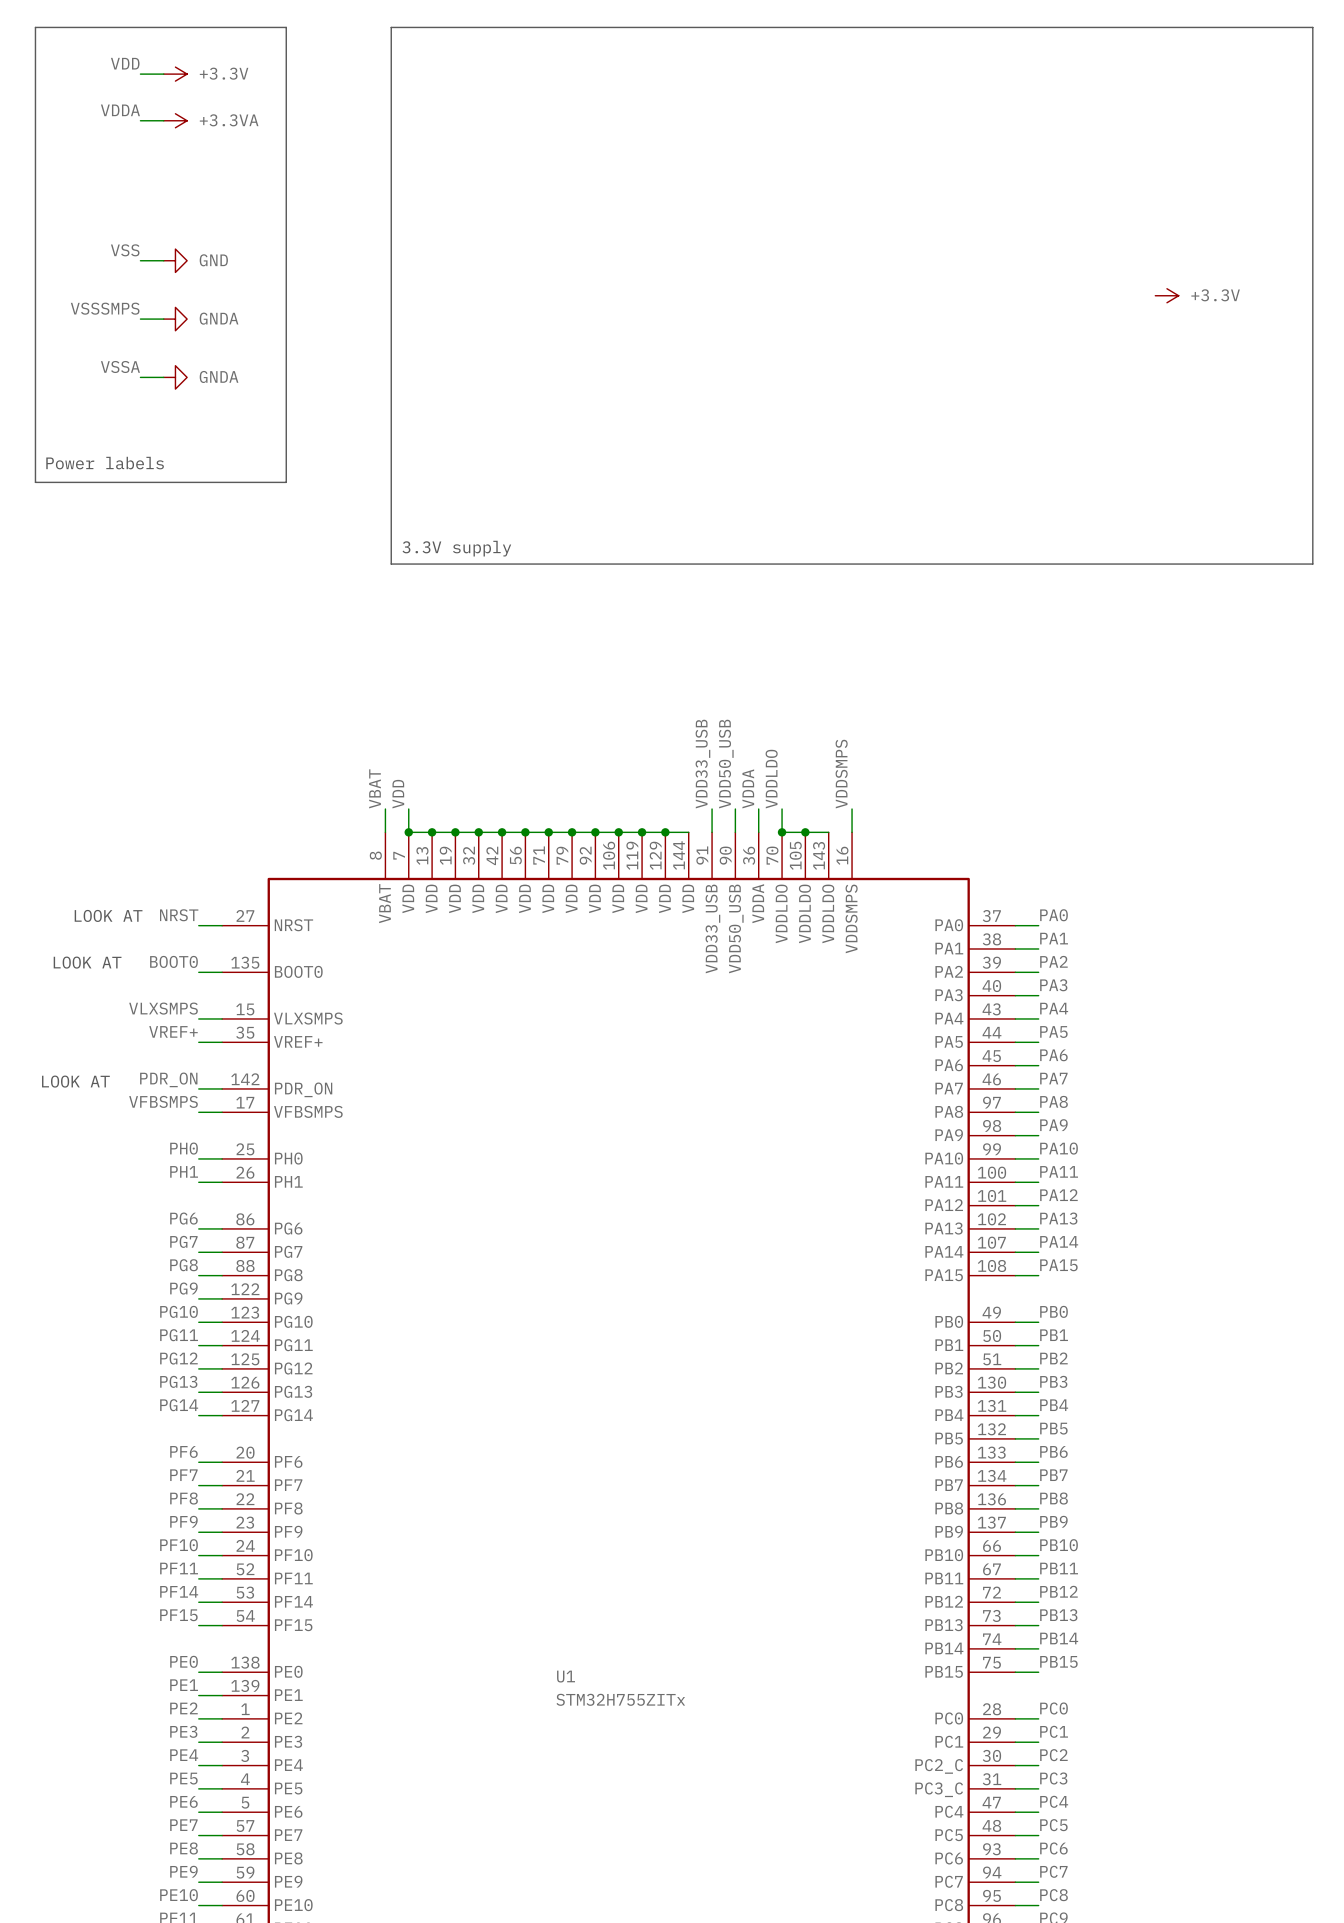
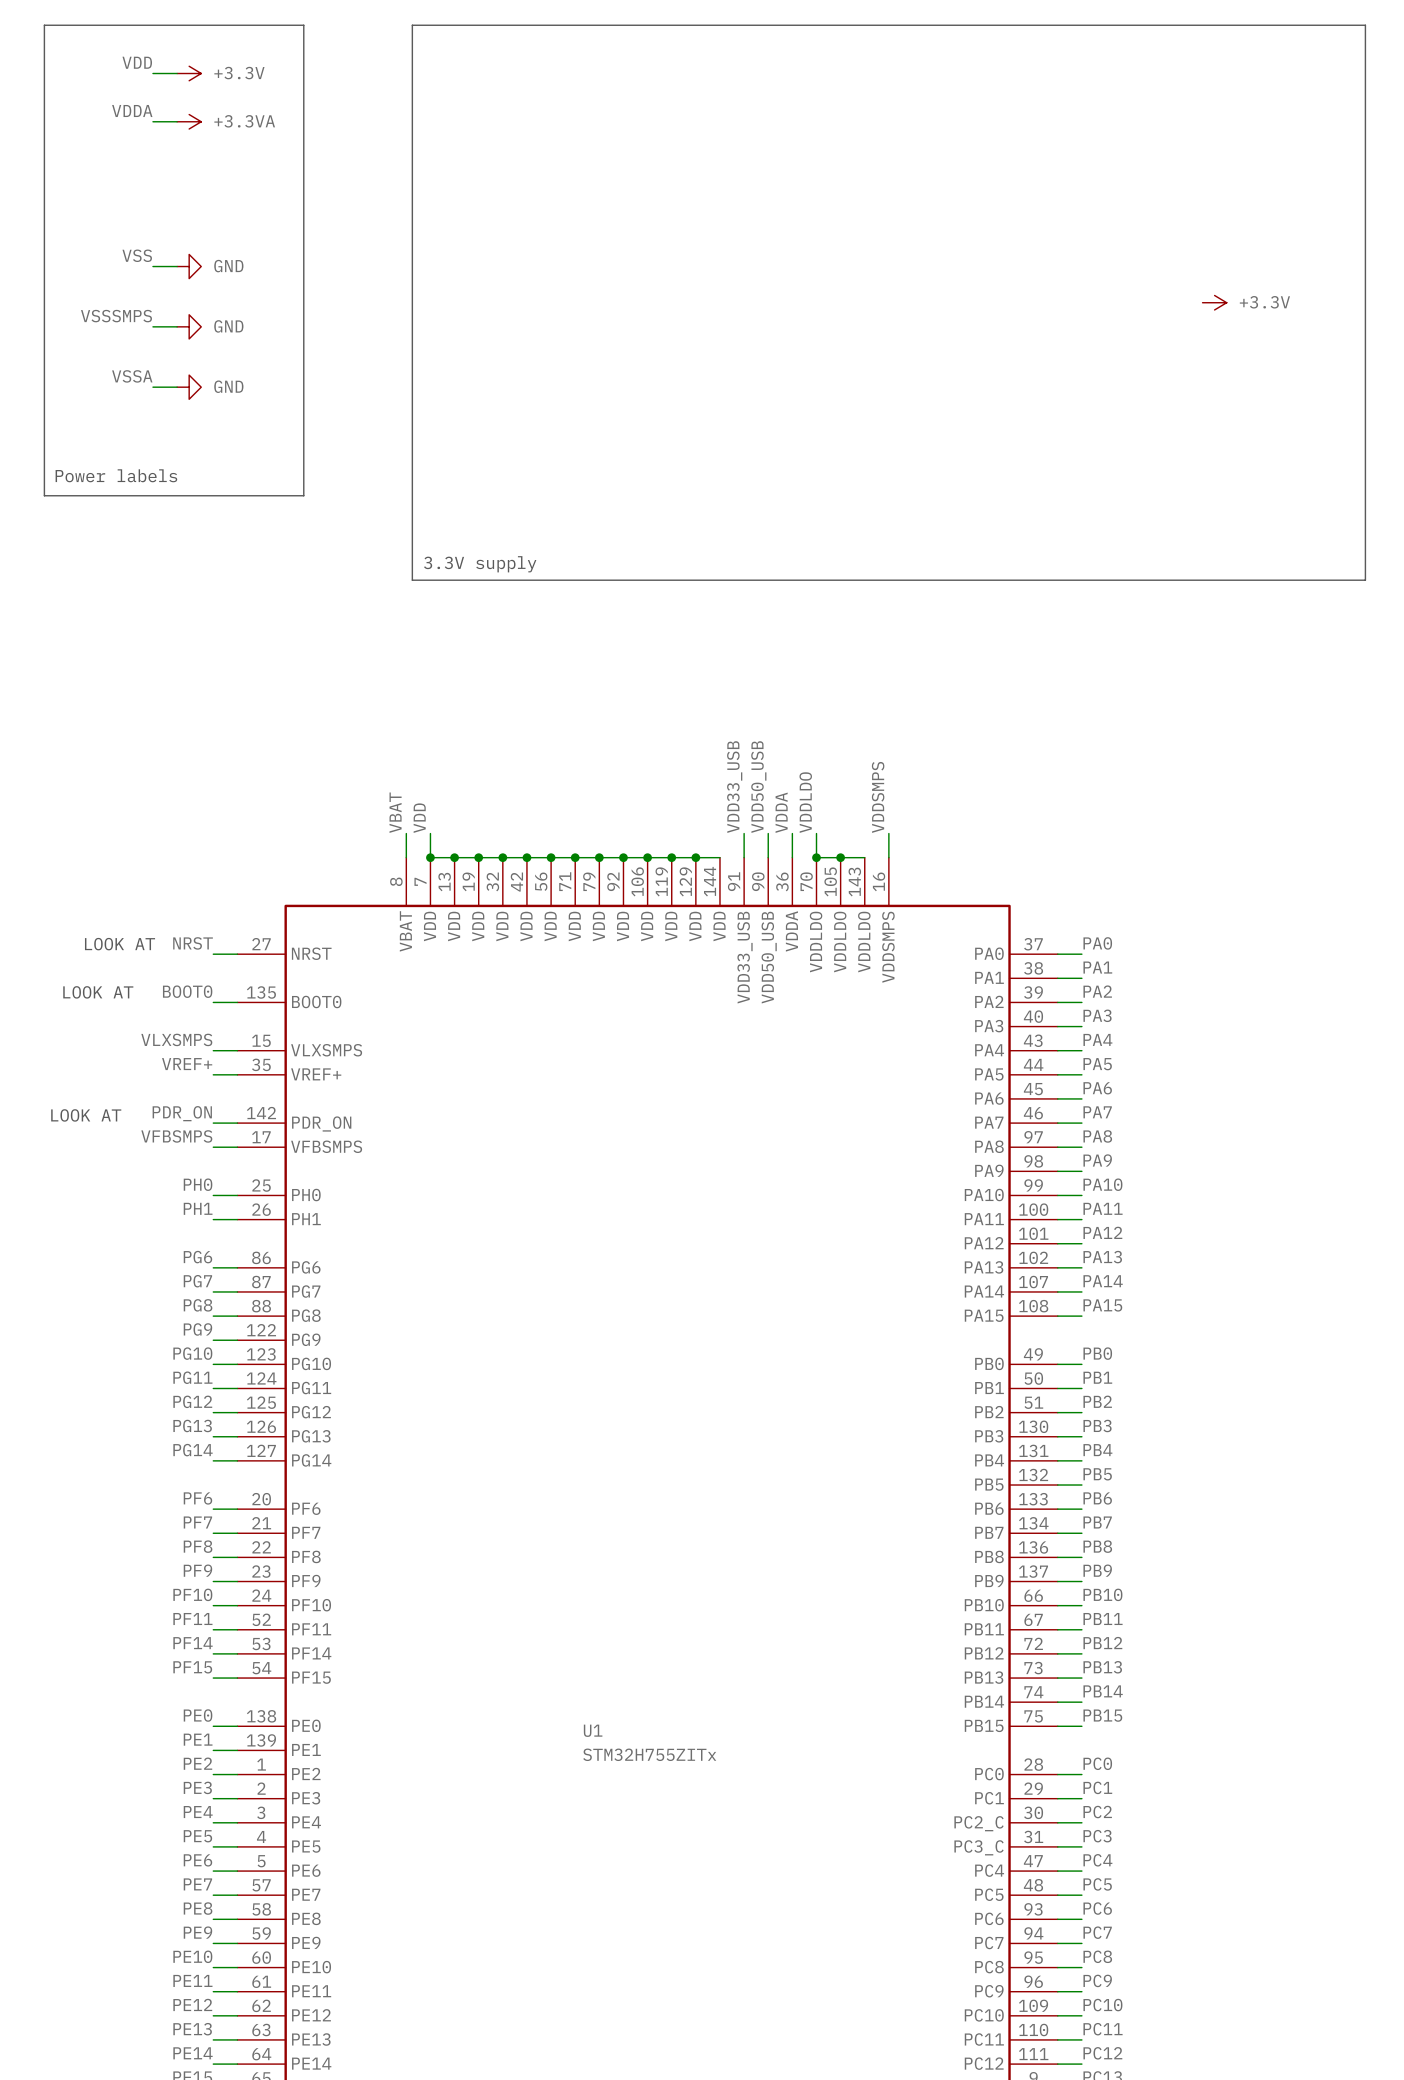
power symbol: GNDA (175, 319) -> GND (189, 326)
power symbol: GNDA (175, 377) -> GND (189, 387)

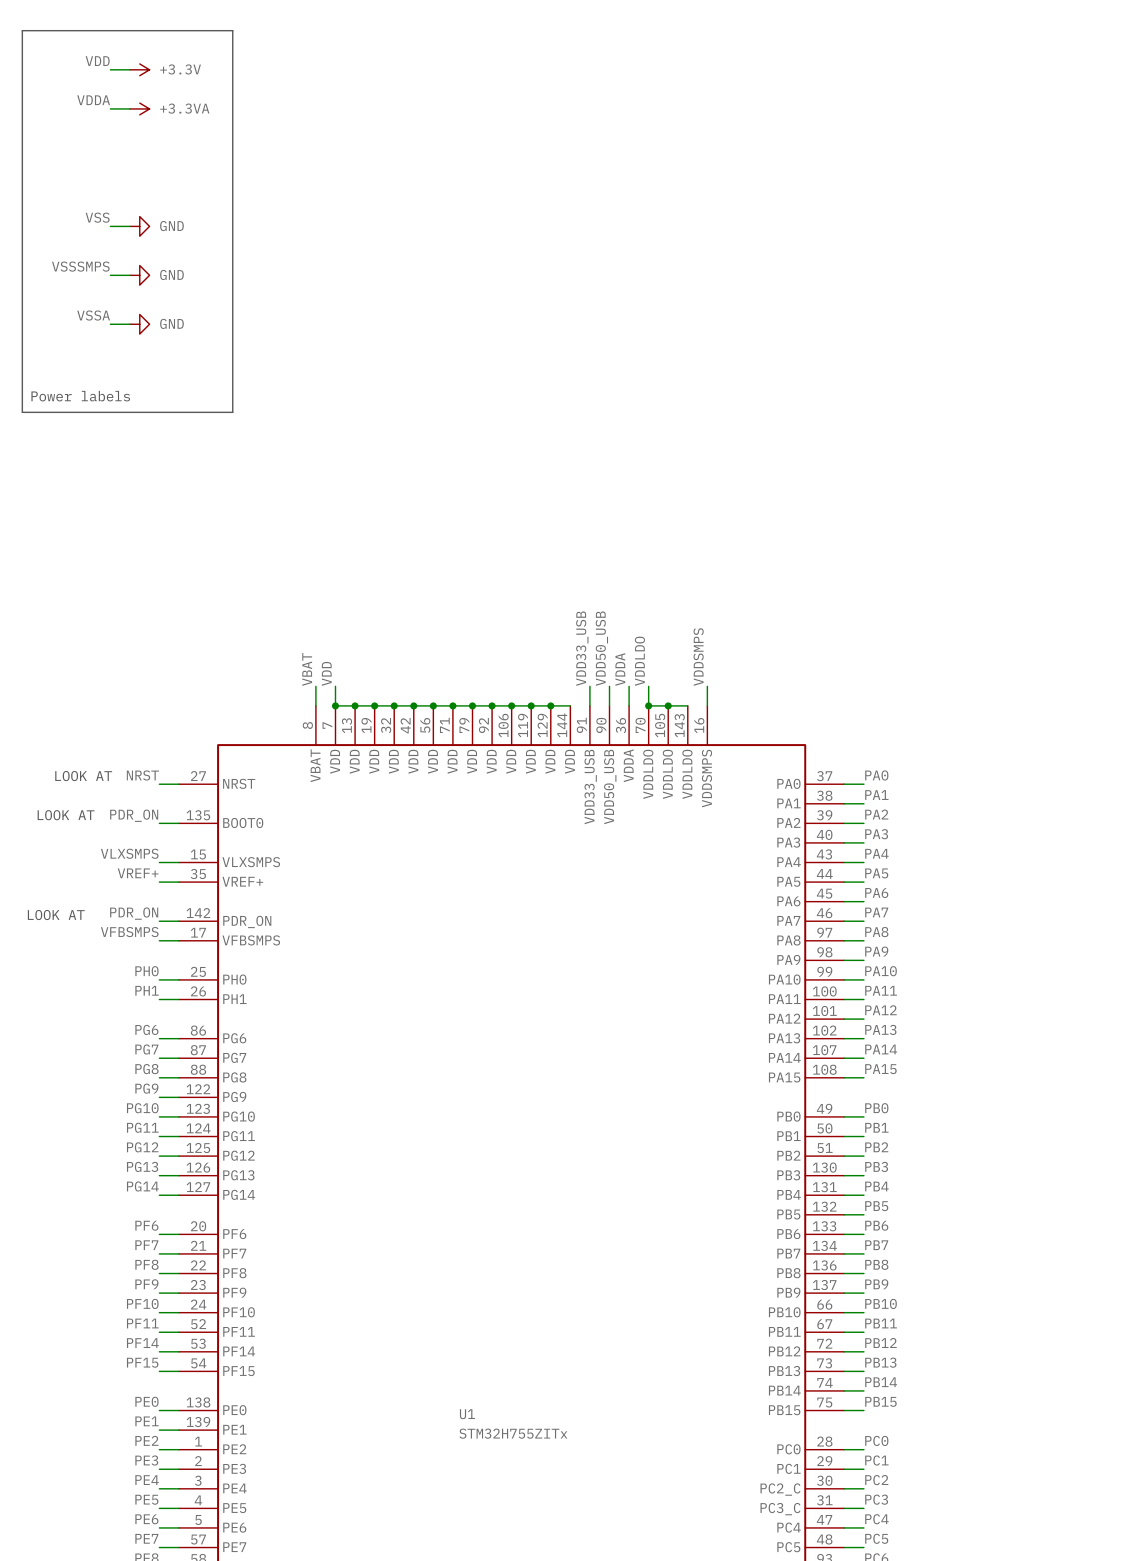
line: (412, 25) (1365, 25) (1365, 580) (412, 580) (412, 25) -> none
power symbol: +3.3V (1214, 302) -> none
text: 3.3V supply (480, 564) -> none
label: BOOT0 (187, 991) -> PDR_ON (134, 815)

